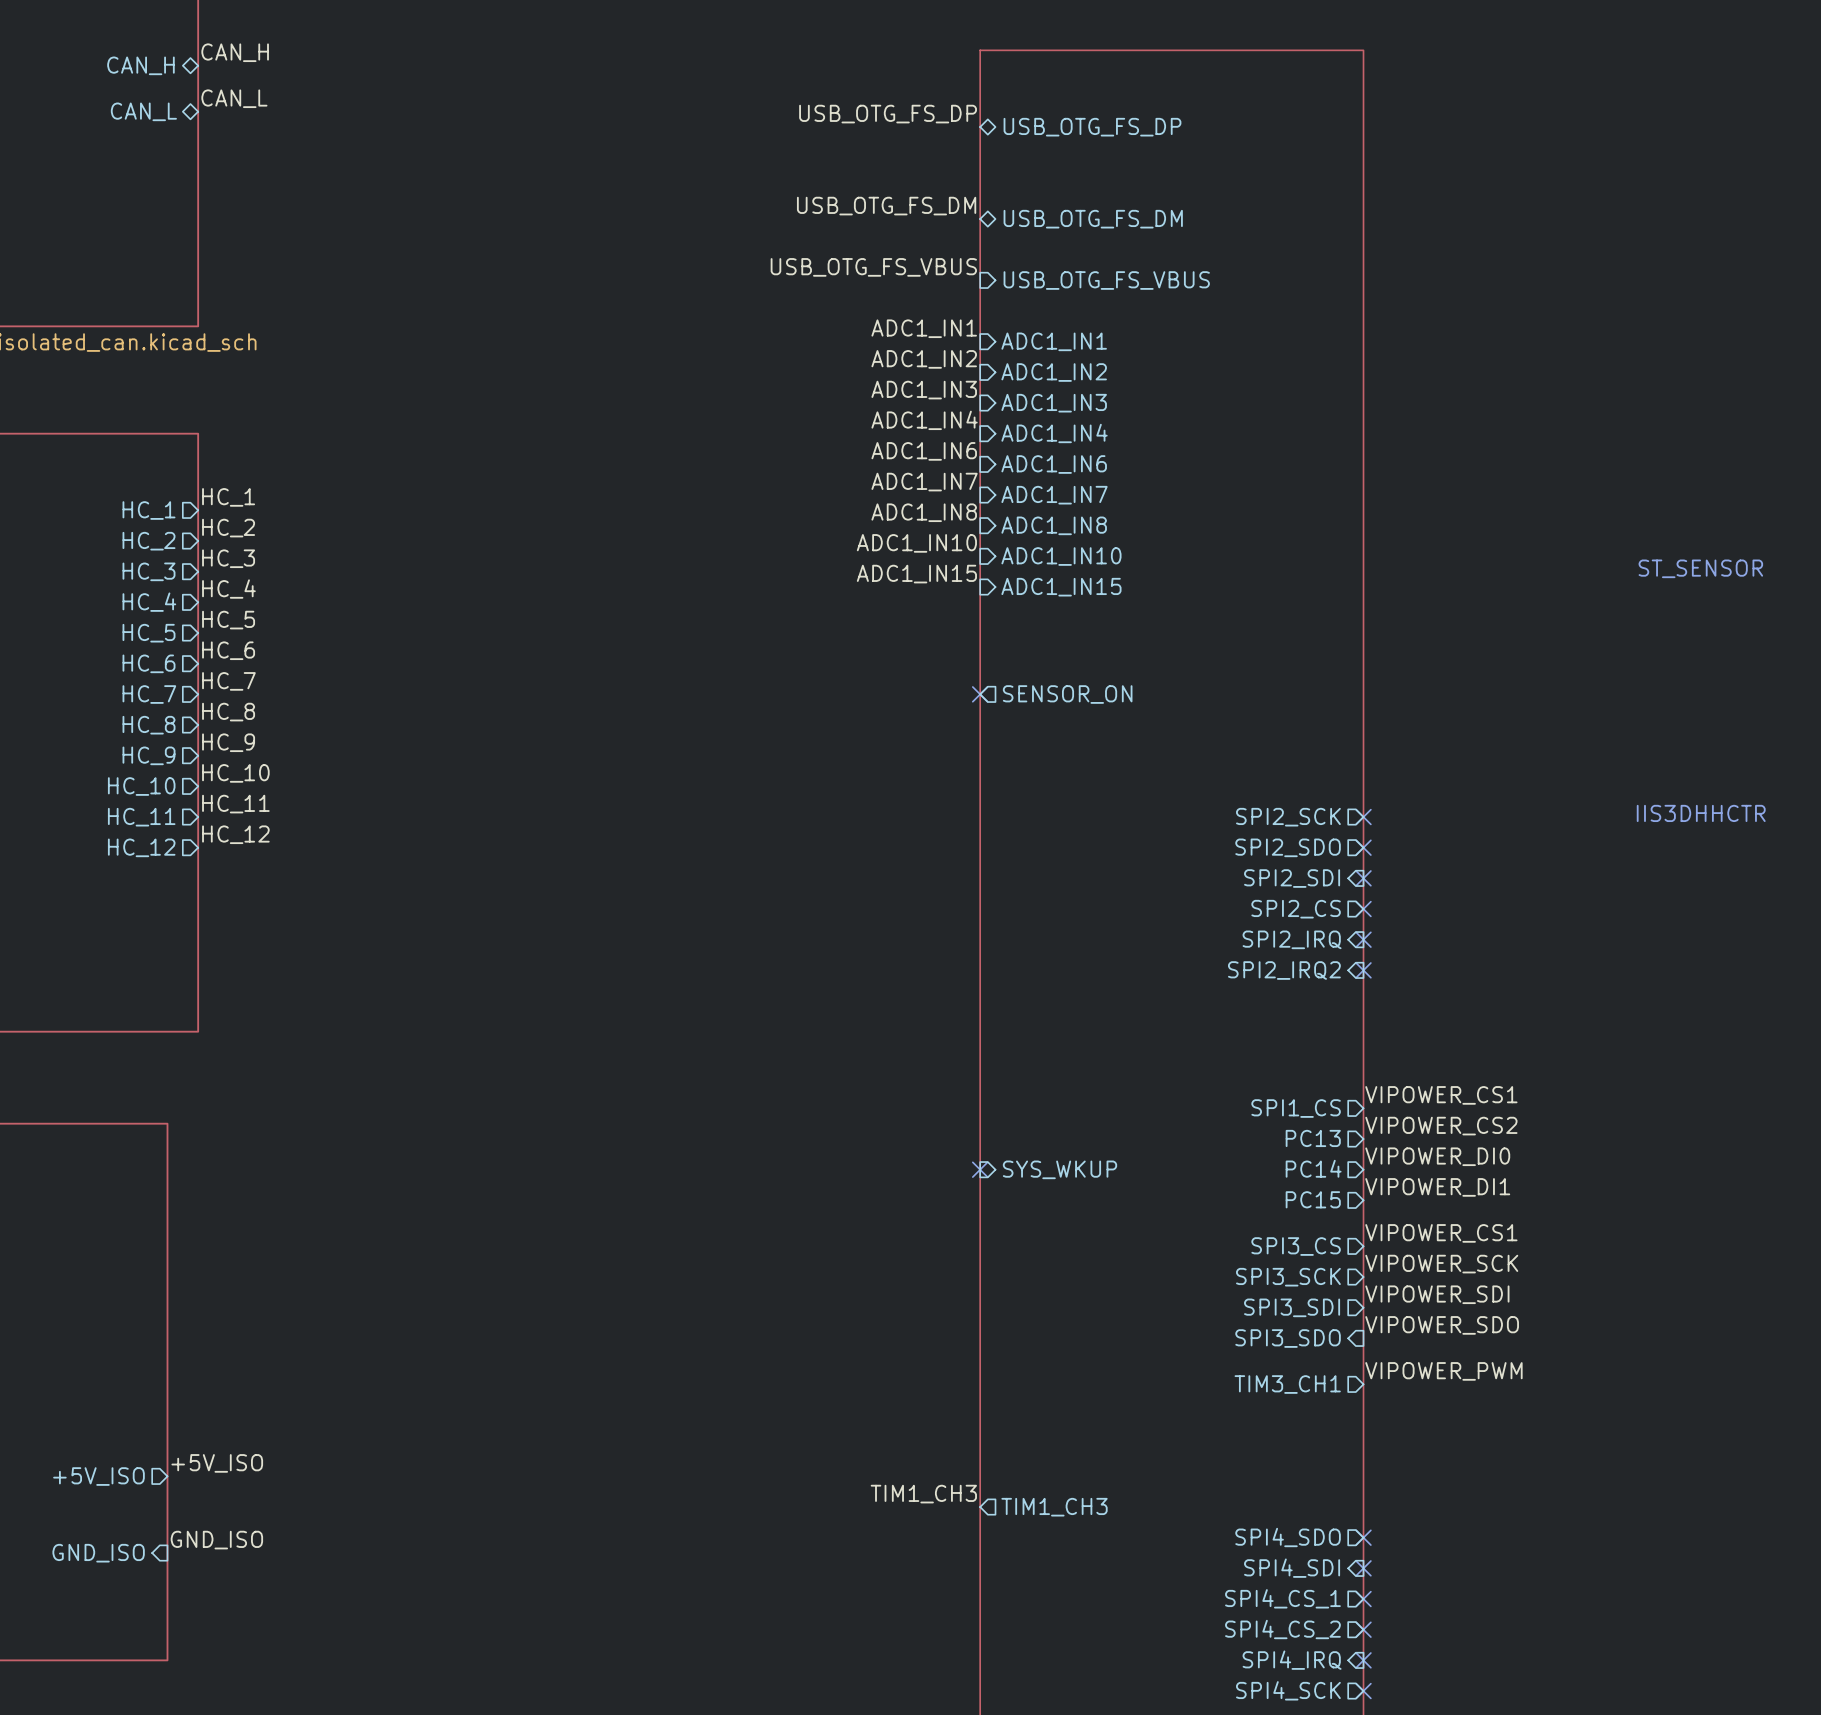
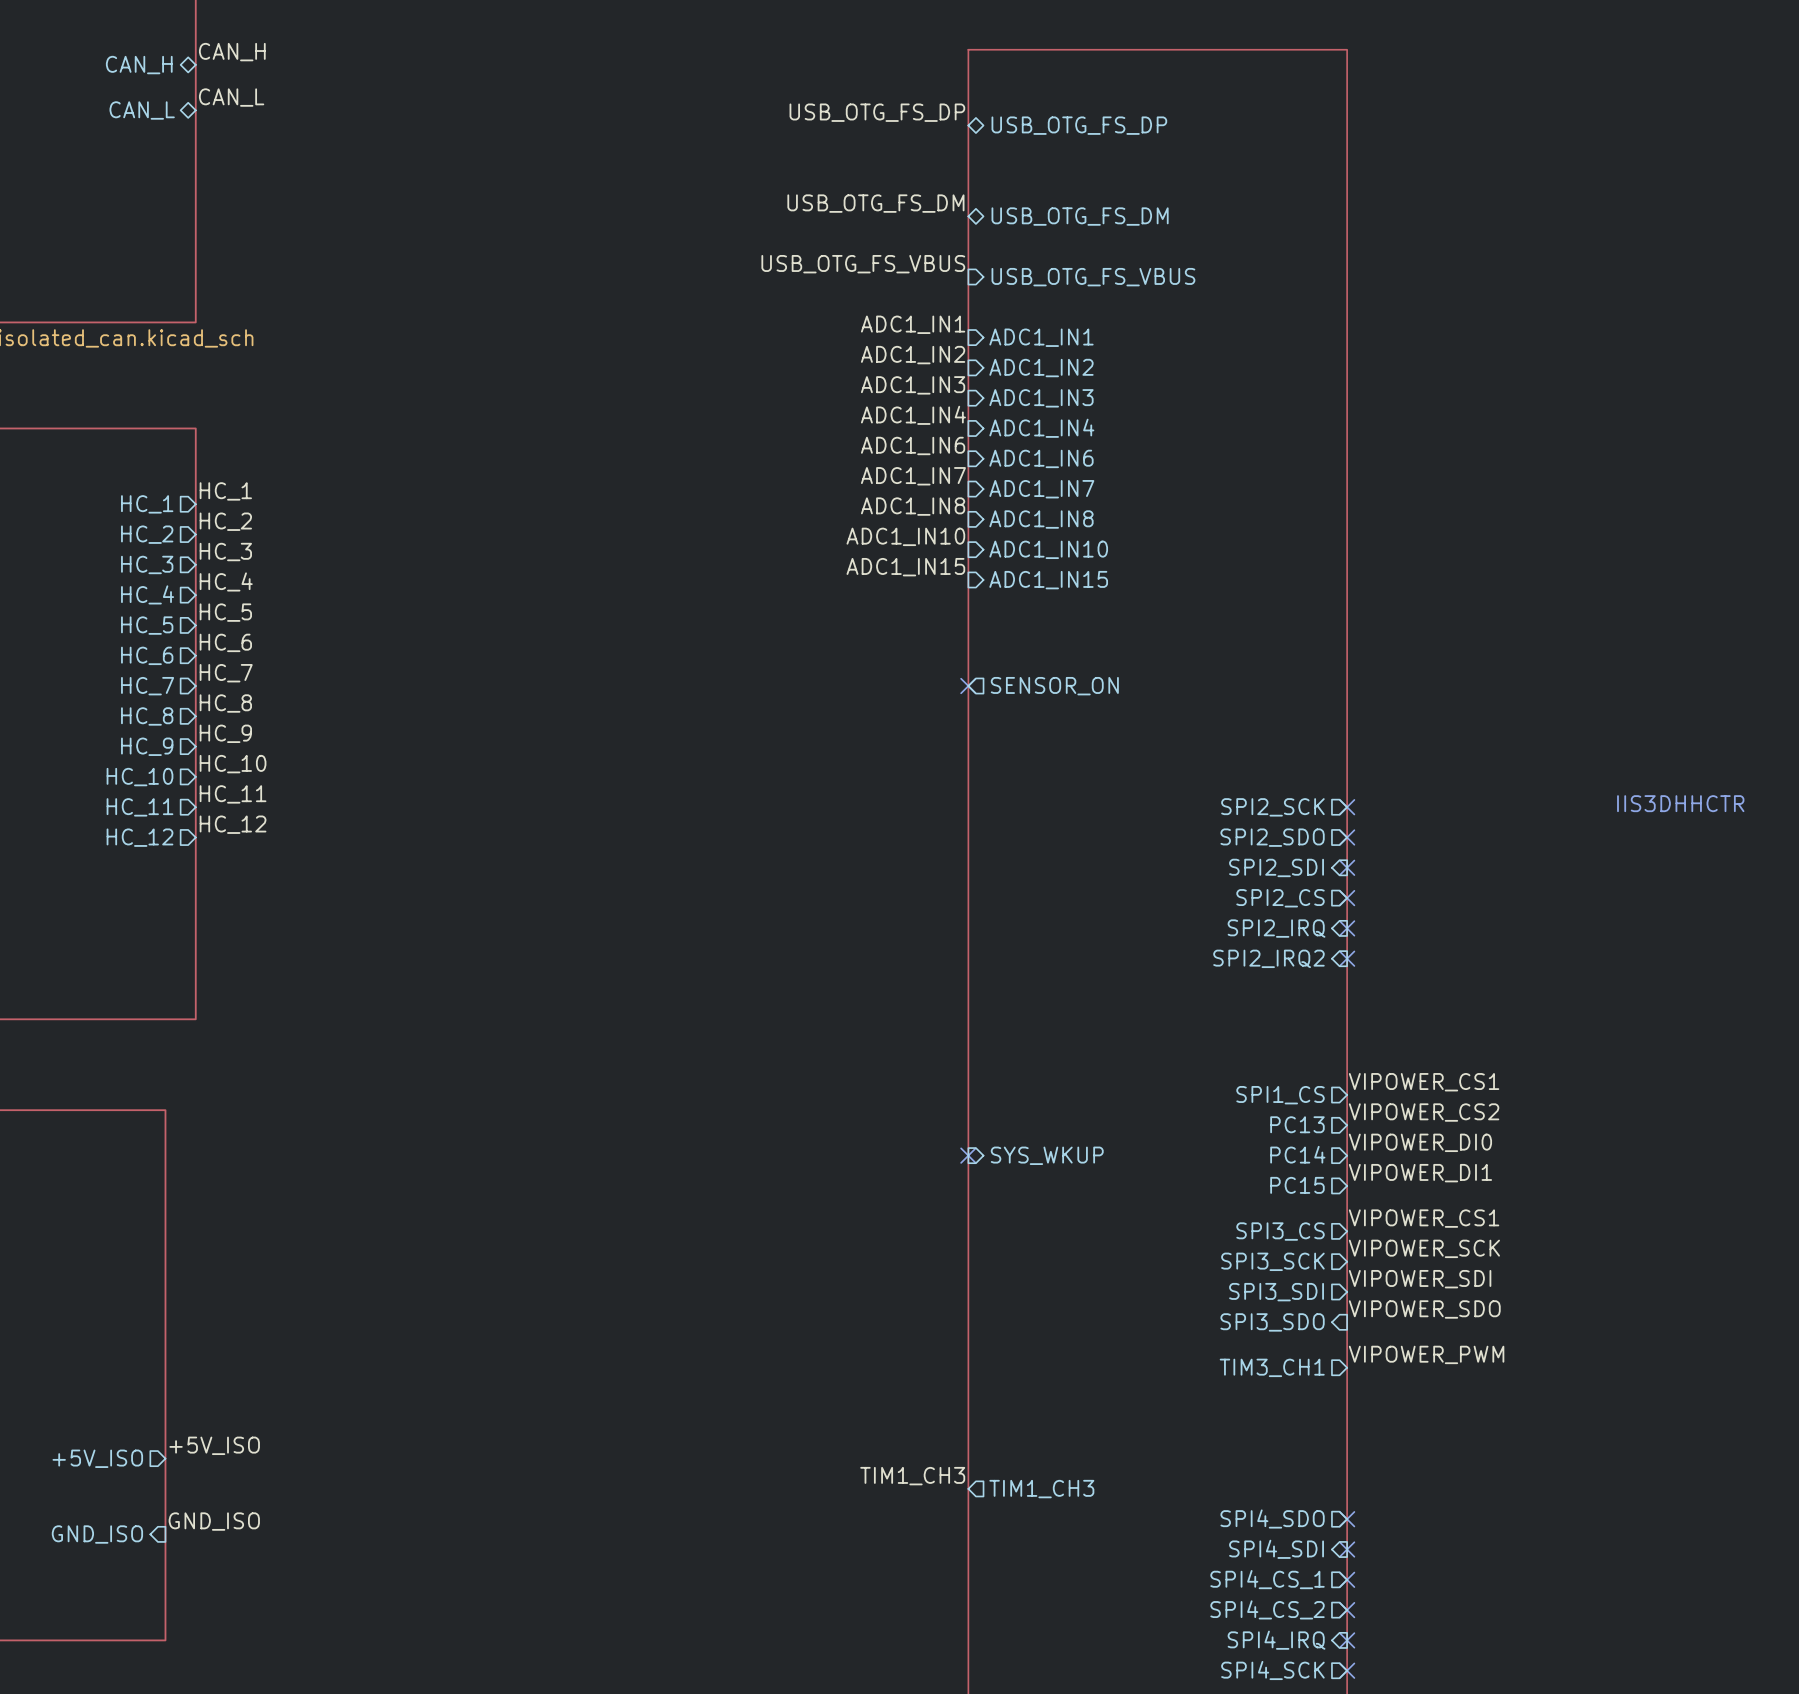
text: ST_SENSOR (1700, 568) -> none

